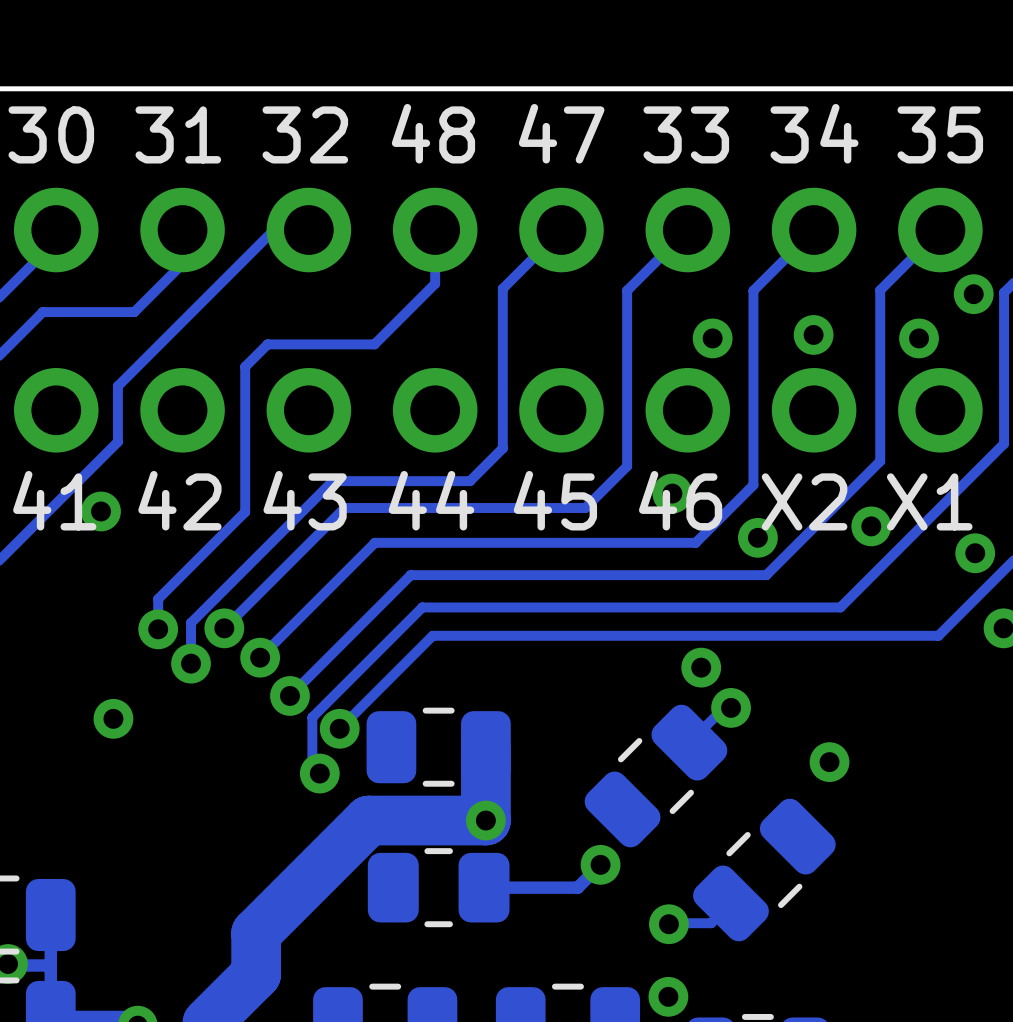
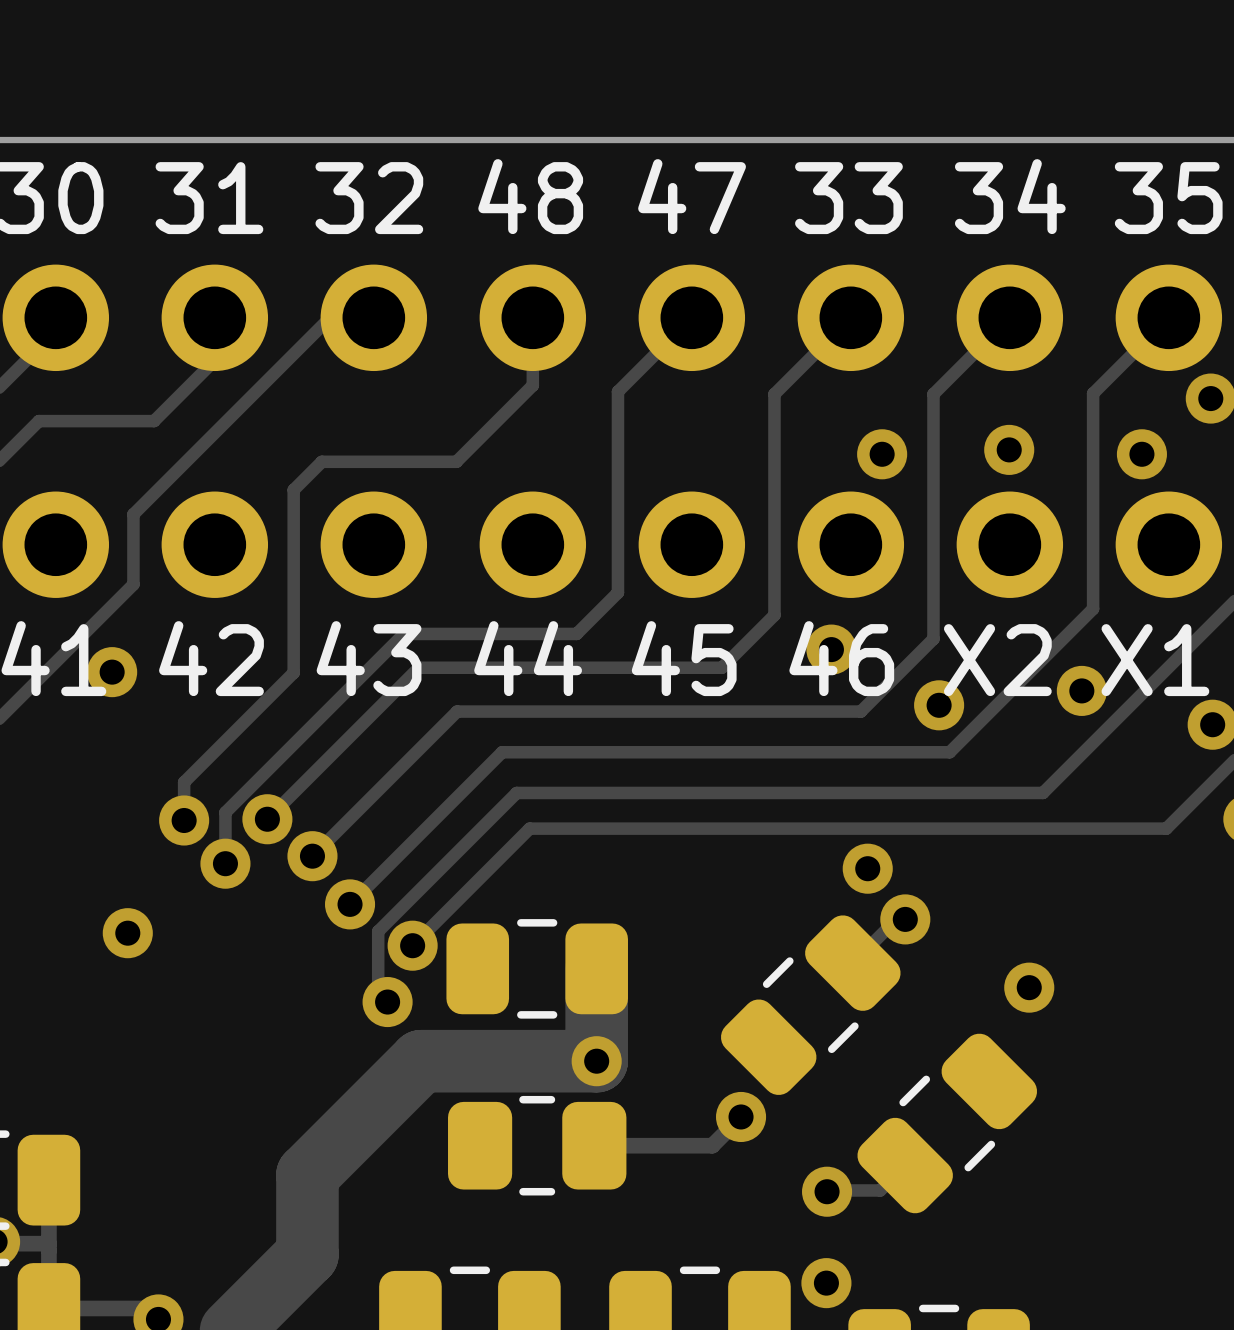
track: (368, 820) (256, 933) -> (449, 1061) (421, 1061) (307, 1174) (307, 1202)

